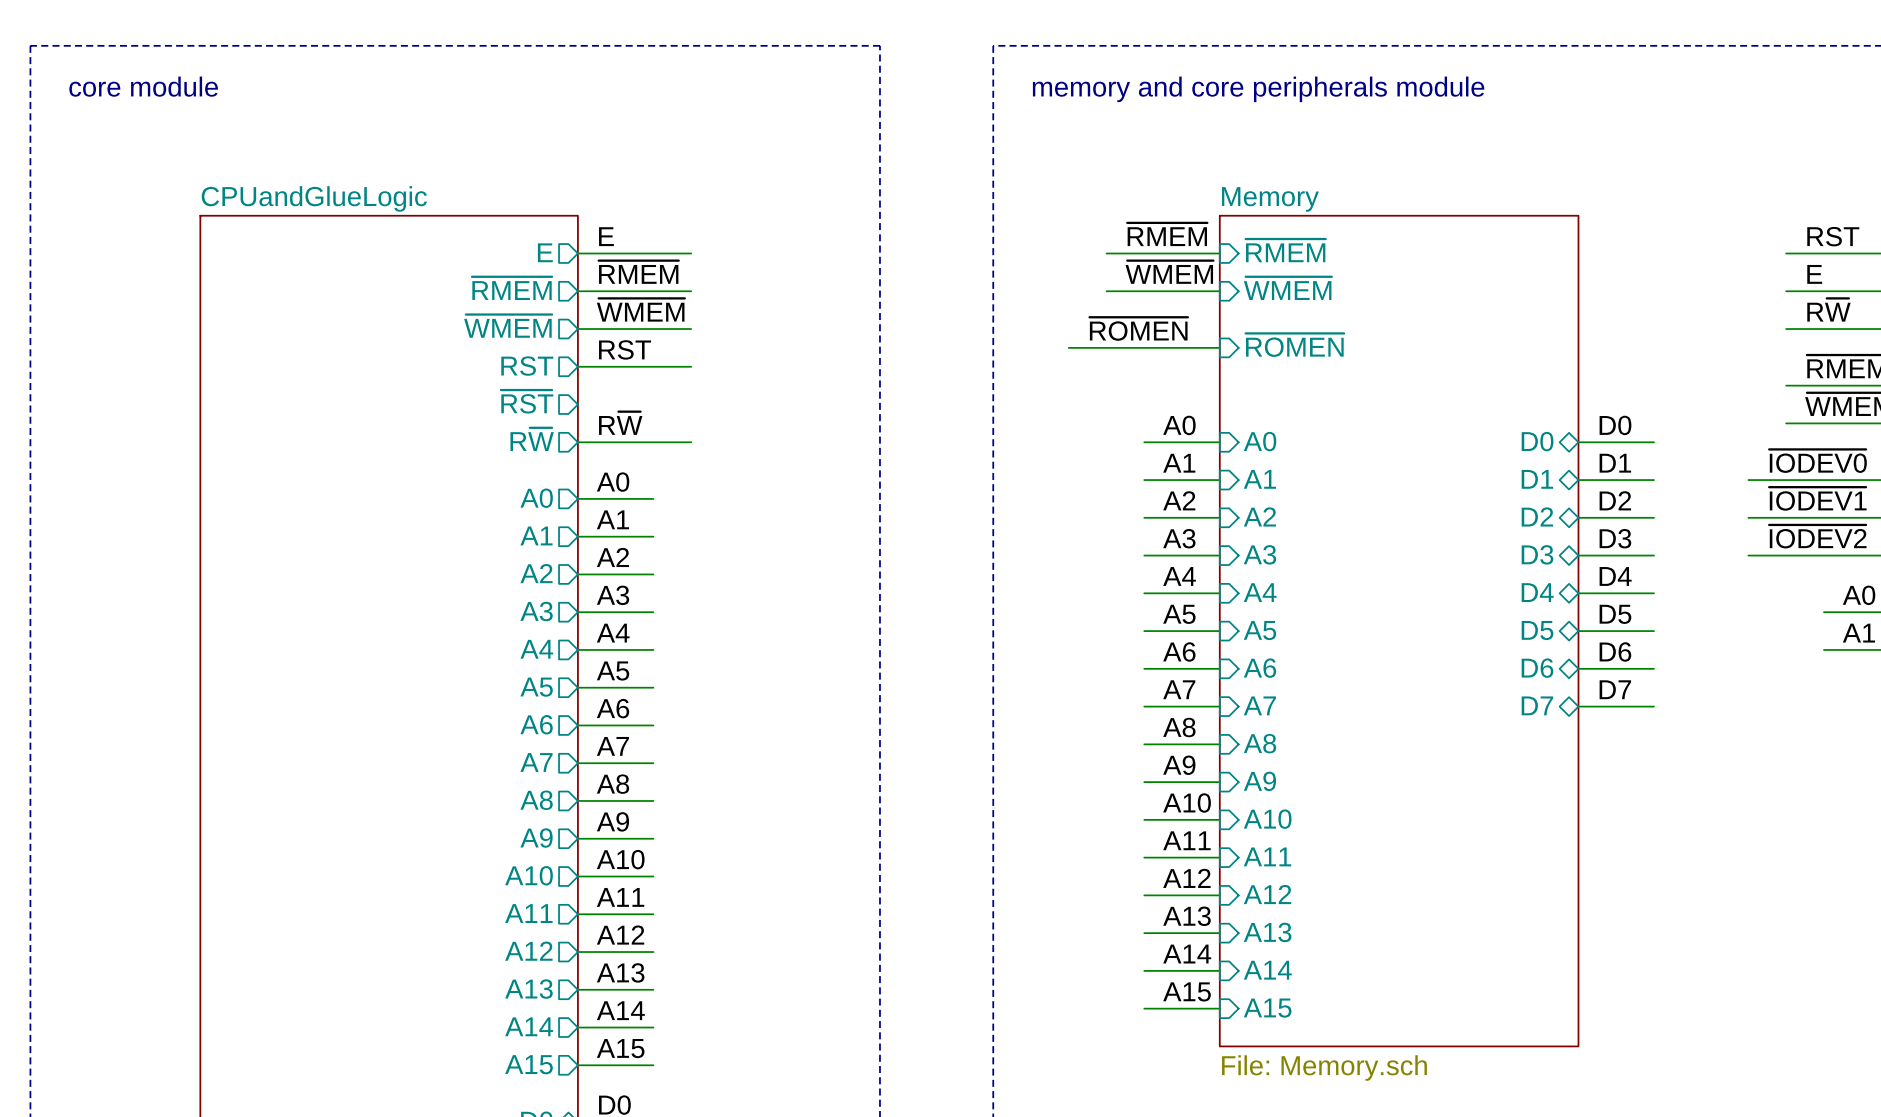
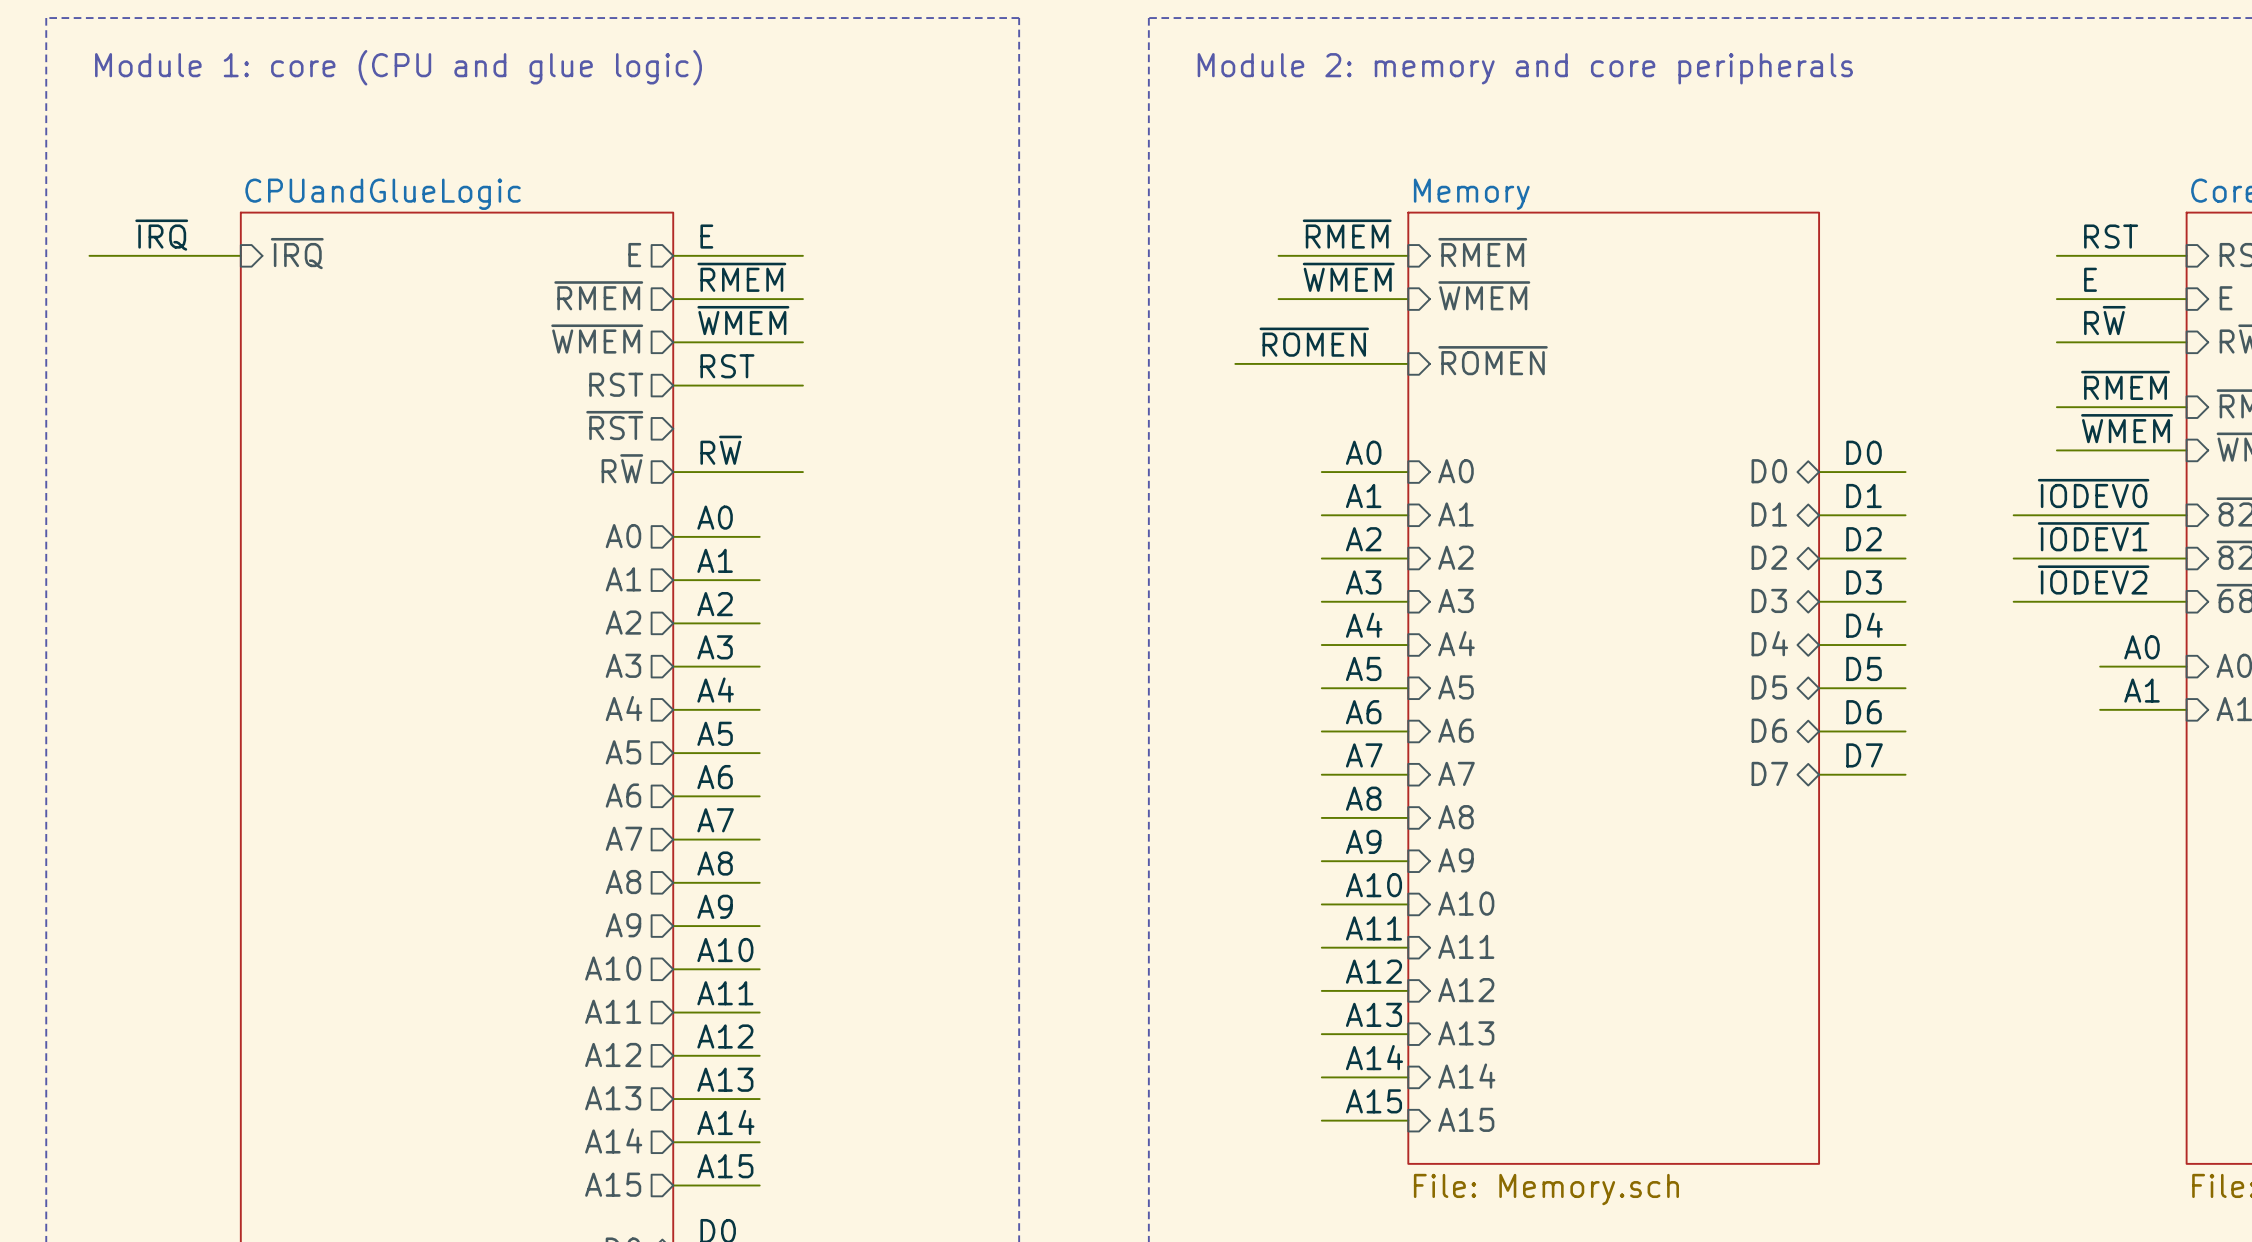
text: core module (143, 86) -> Module 1: core (CPU and glue logic) (398, 67)
text: memory and core peripherals module (1258, 89) -> Module 2: memory and core peripherals (1525, 68)
label: none -> ~{IRQ} (161, 235)
wire: none -> (89, 255) (240, 255)
sheet pin: none -> ~{IRQ} (297, 253)

